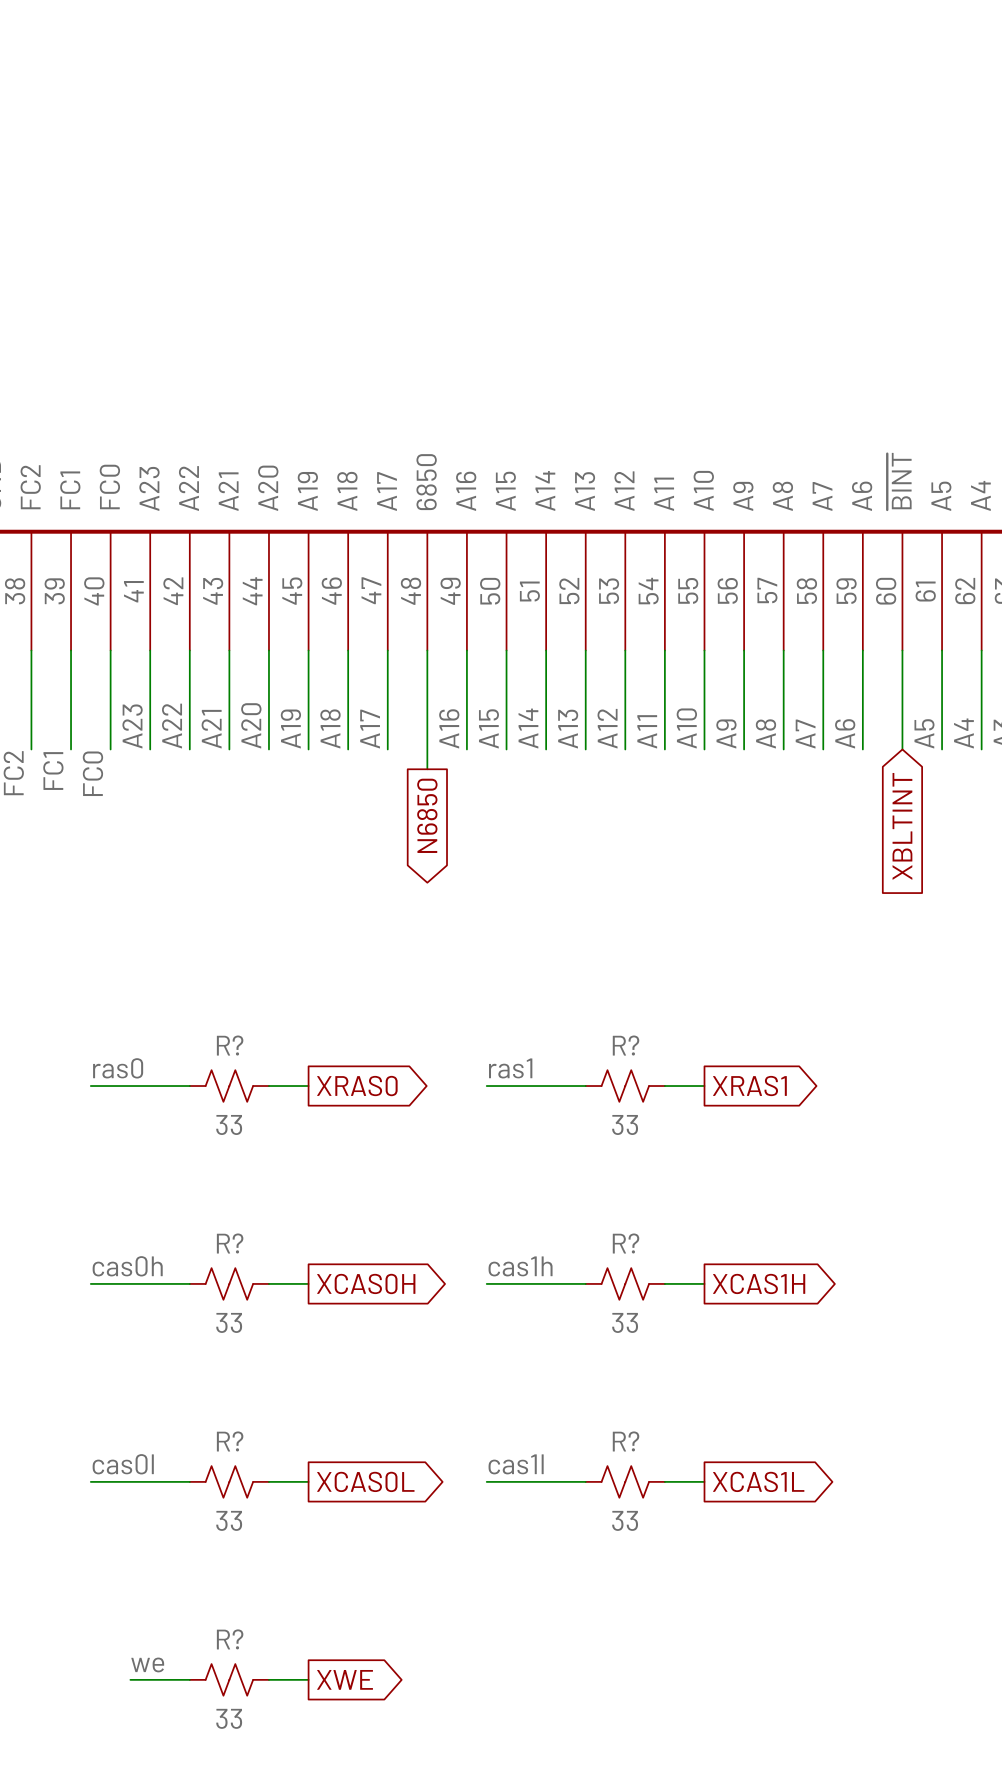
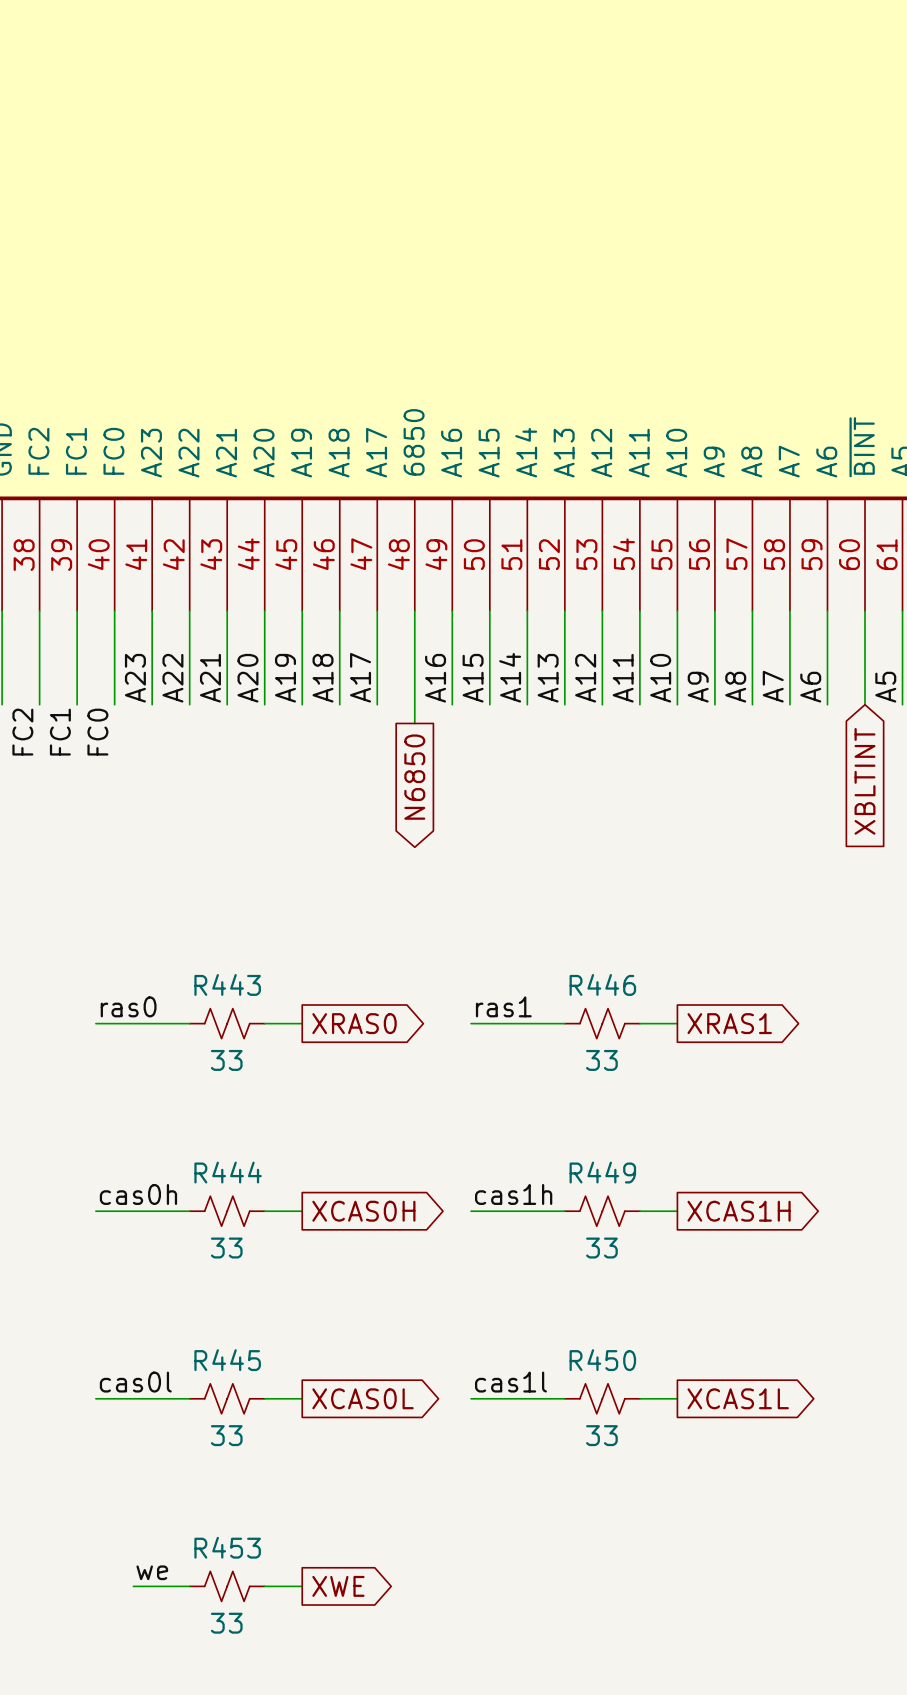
R? name: R? (230, 1045) -> R443 (227, 984)
R? name: R? (626, 1045) -> R446 (602, 984)
R? name: R? (230, 1243) -> R444 (228, 1172)
R? name: R? (626, 1243) -> R449 (602, 1172)
R? name: R? (230, 1441) -> R445 (227, 1360)
R? name: R? (626, 1441) -> R450 (602, 1360)
R? name: R? (230, 1639) -> R453 (227, 1547)

